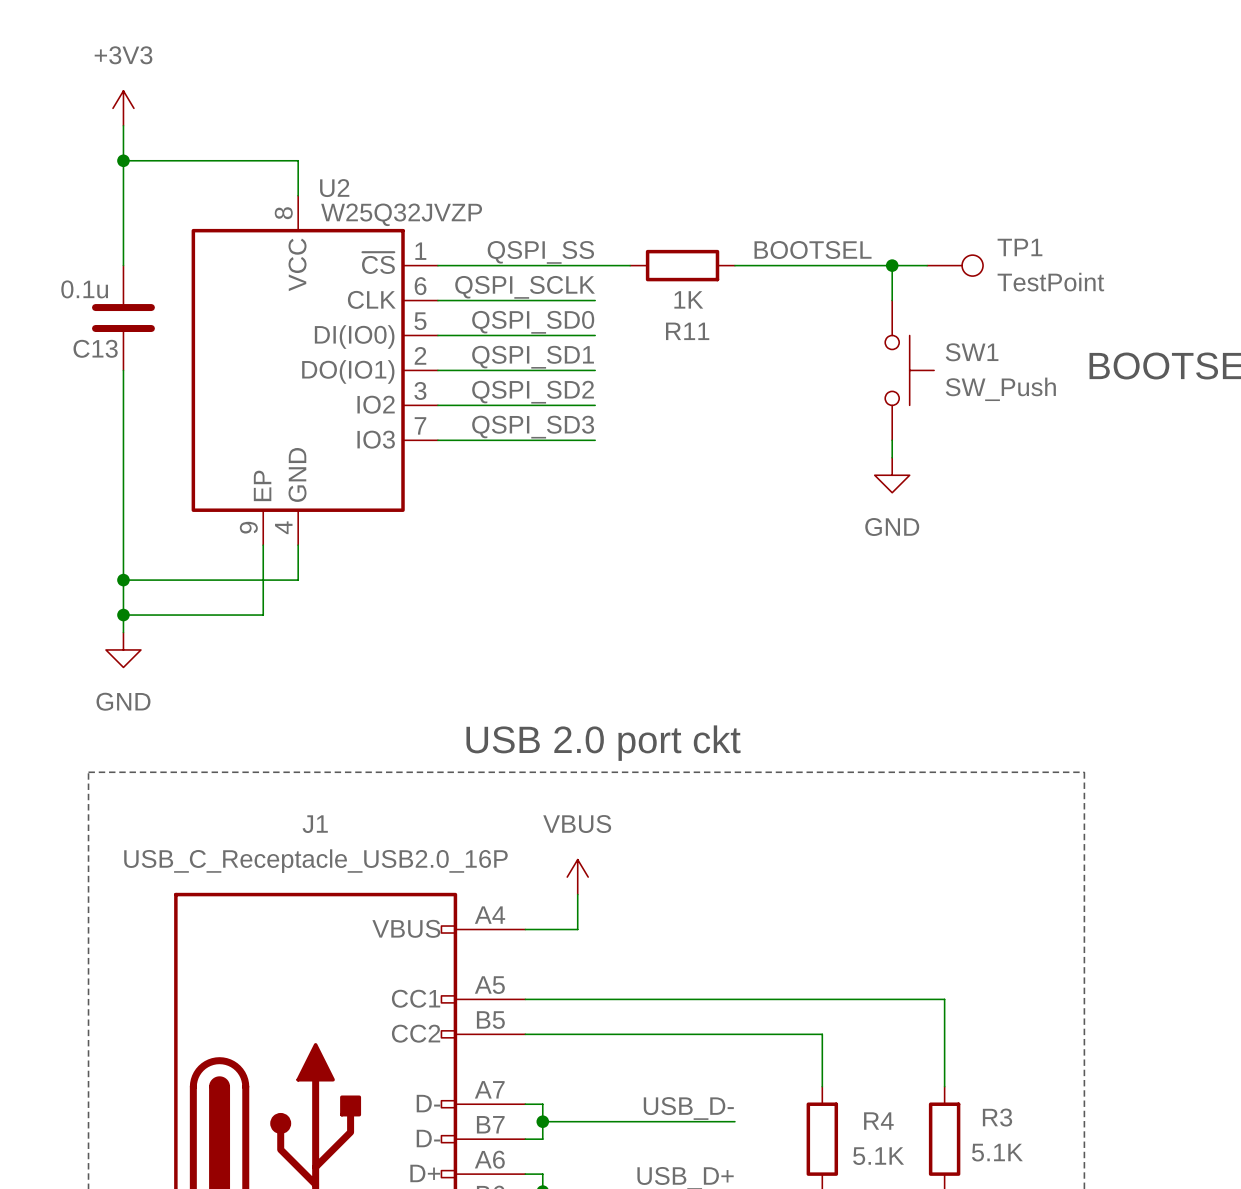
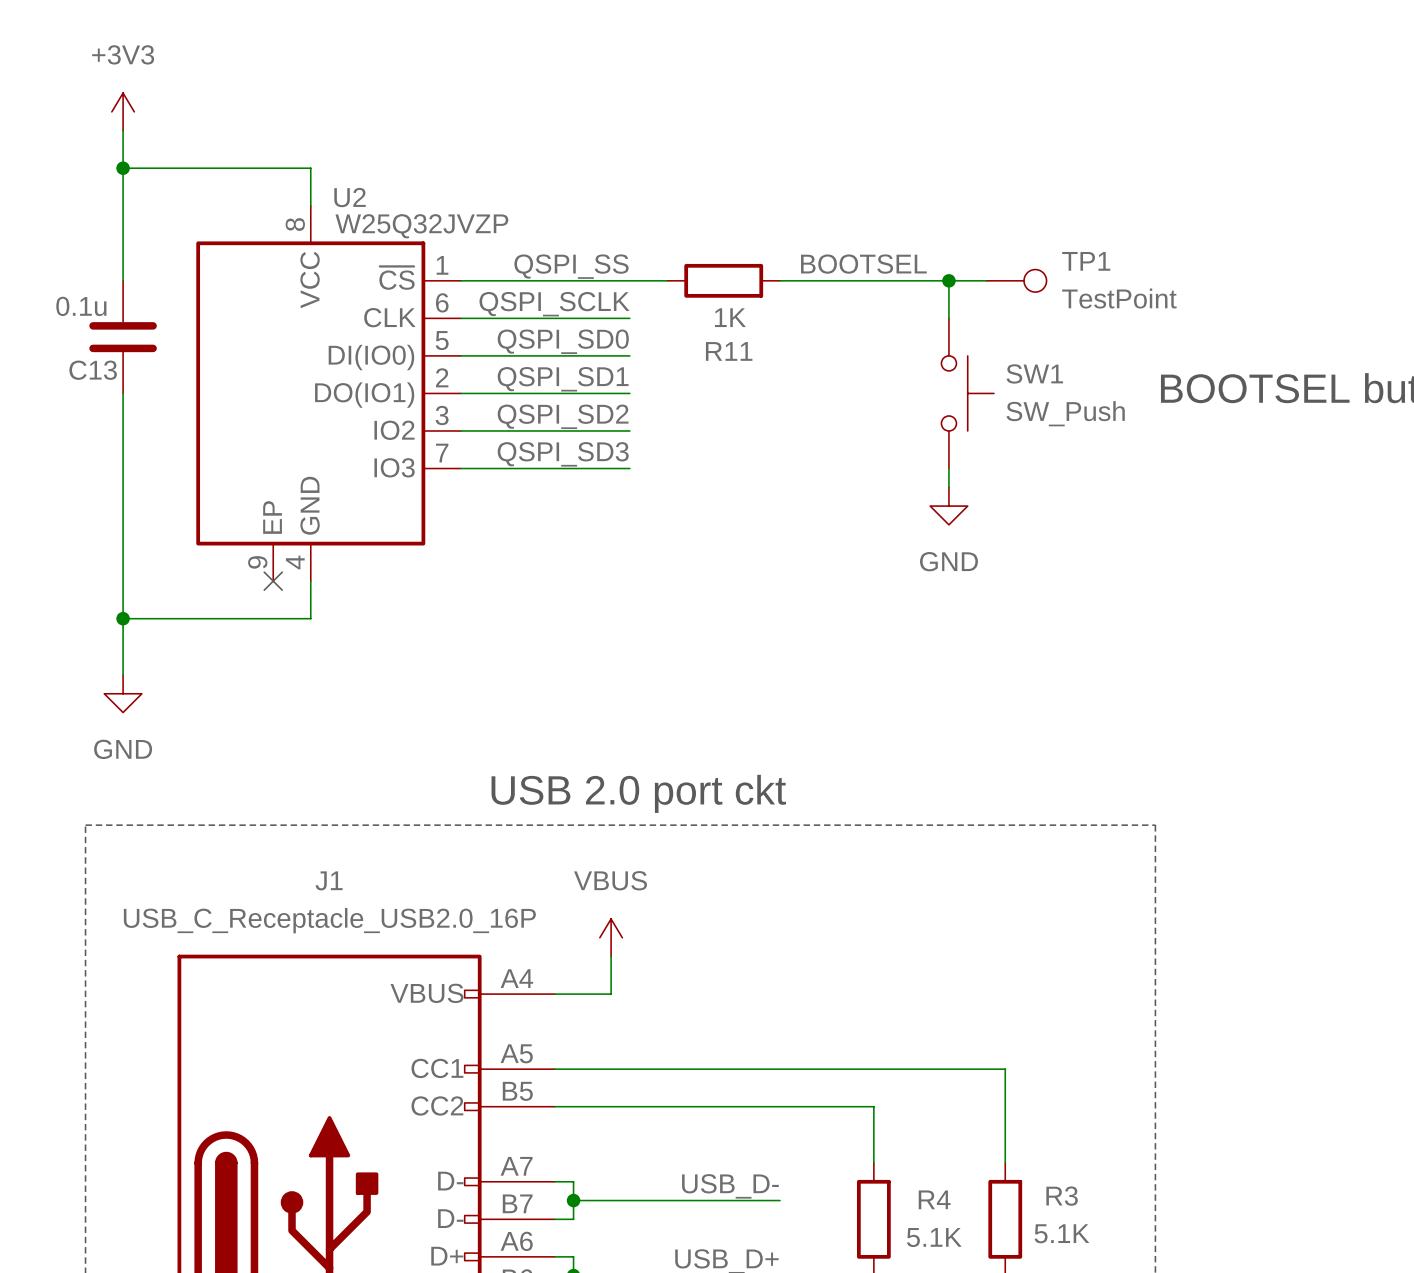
wire: (263, 545) (263, 615) (123, 615) -> none
no-connect mark: none -> (273, 581)
junction: (123, 615) -> none

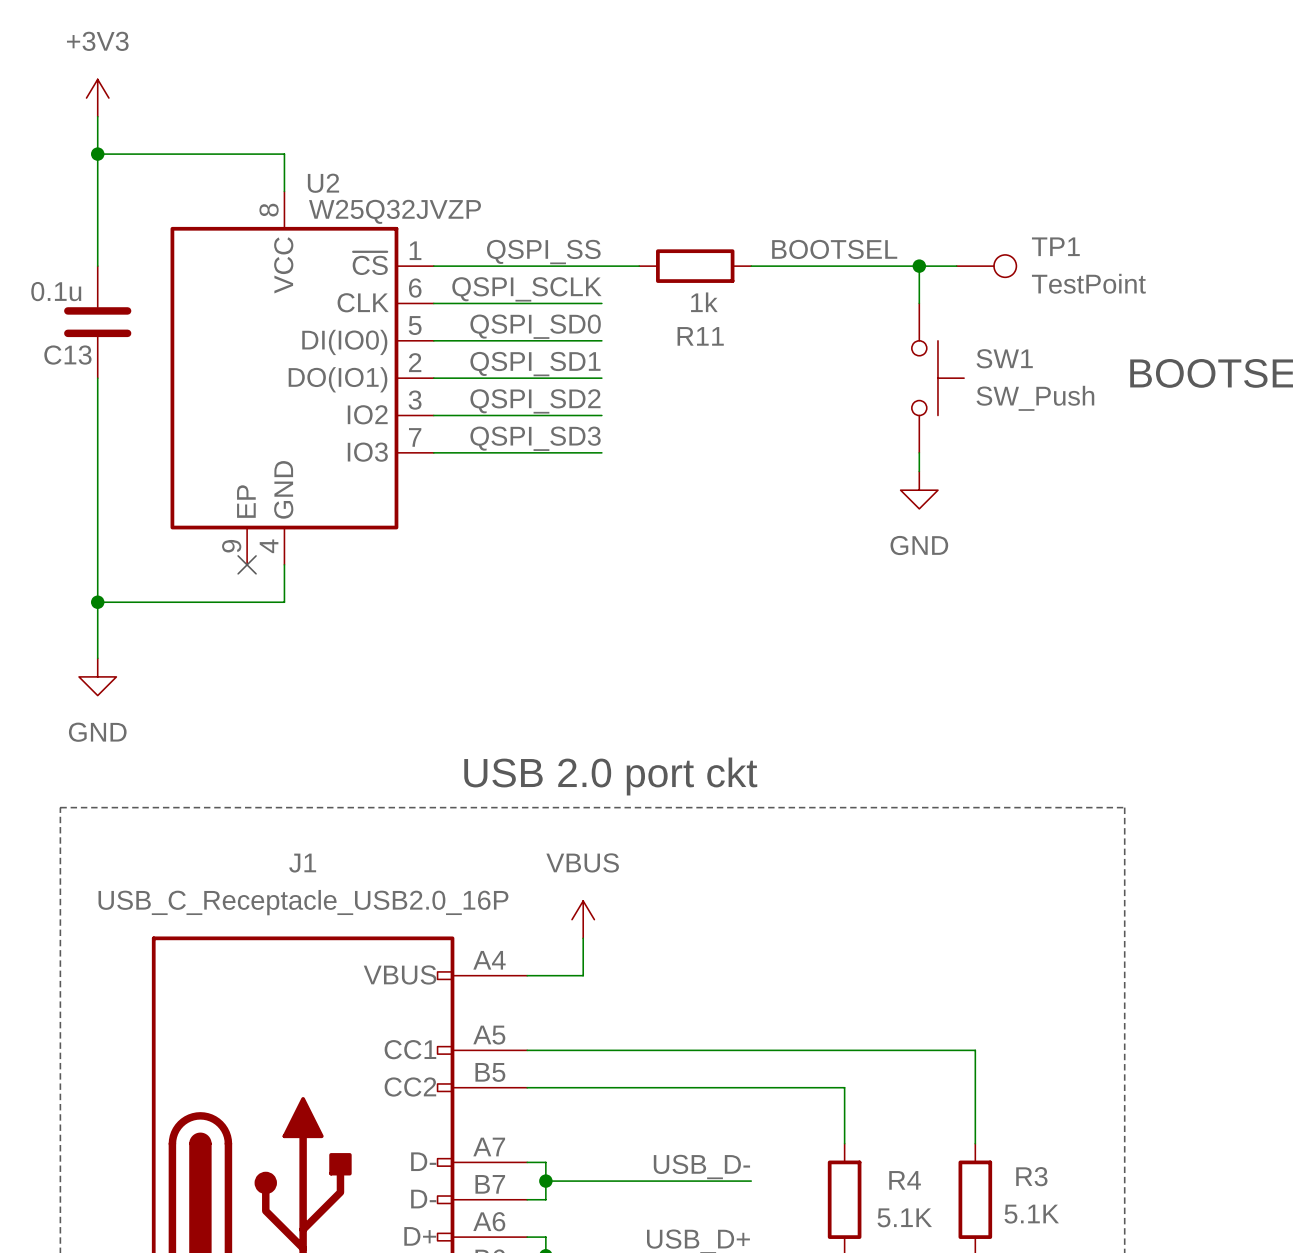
R11 value: 1K (730, 317) -> 1k (704, 302)

